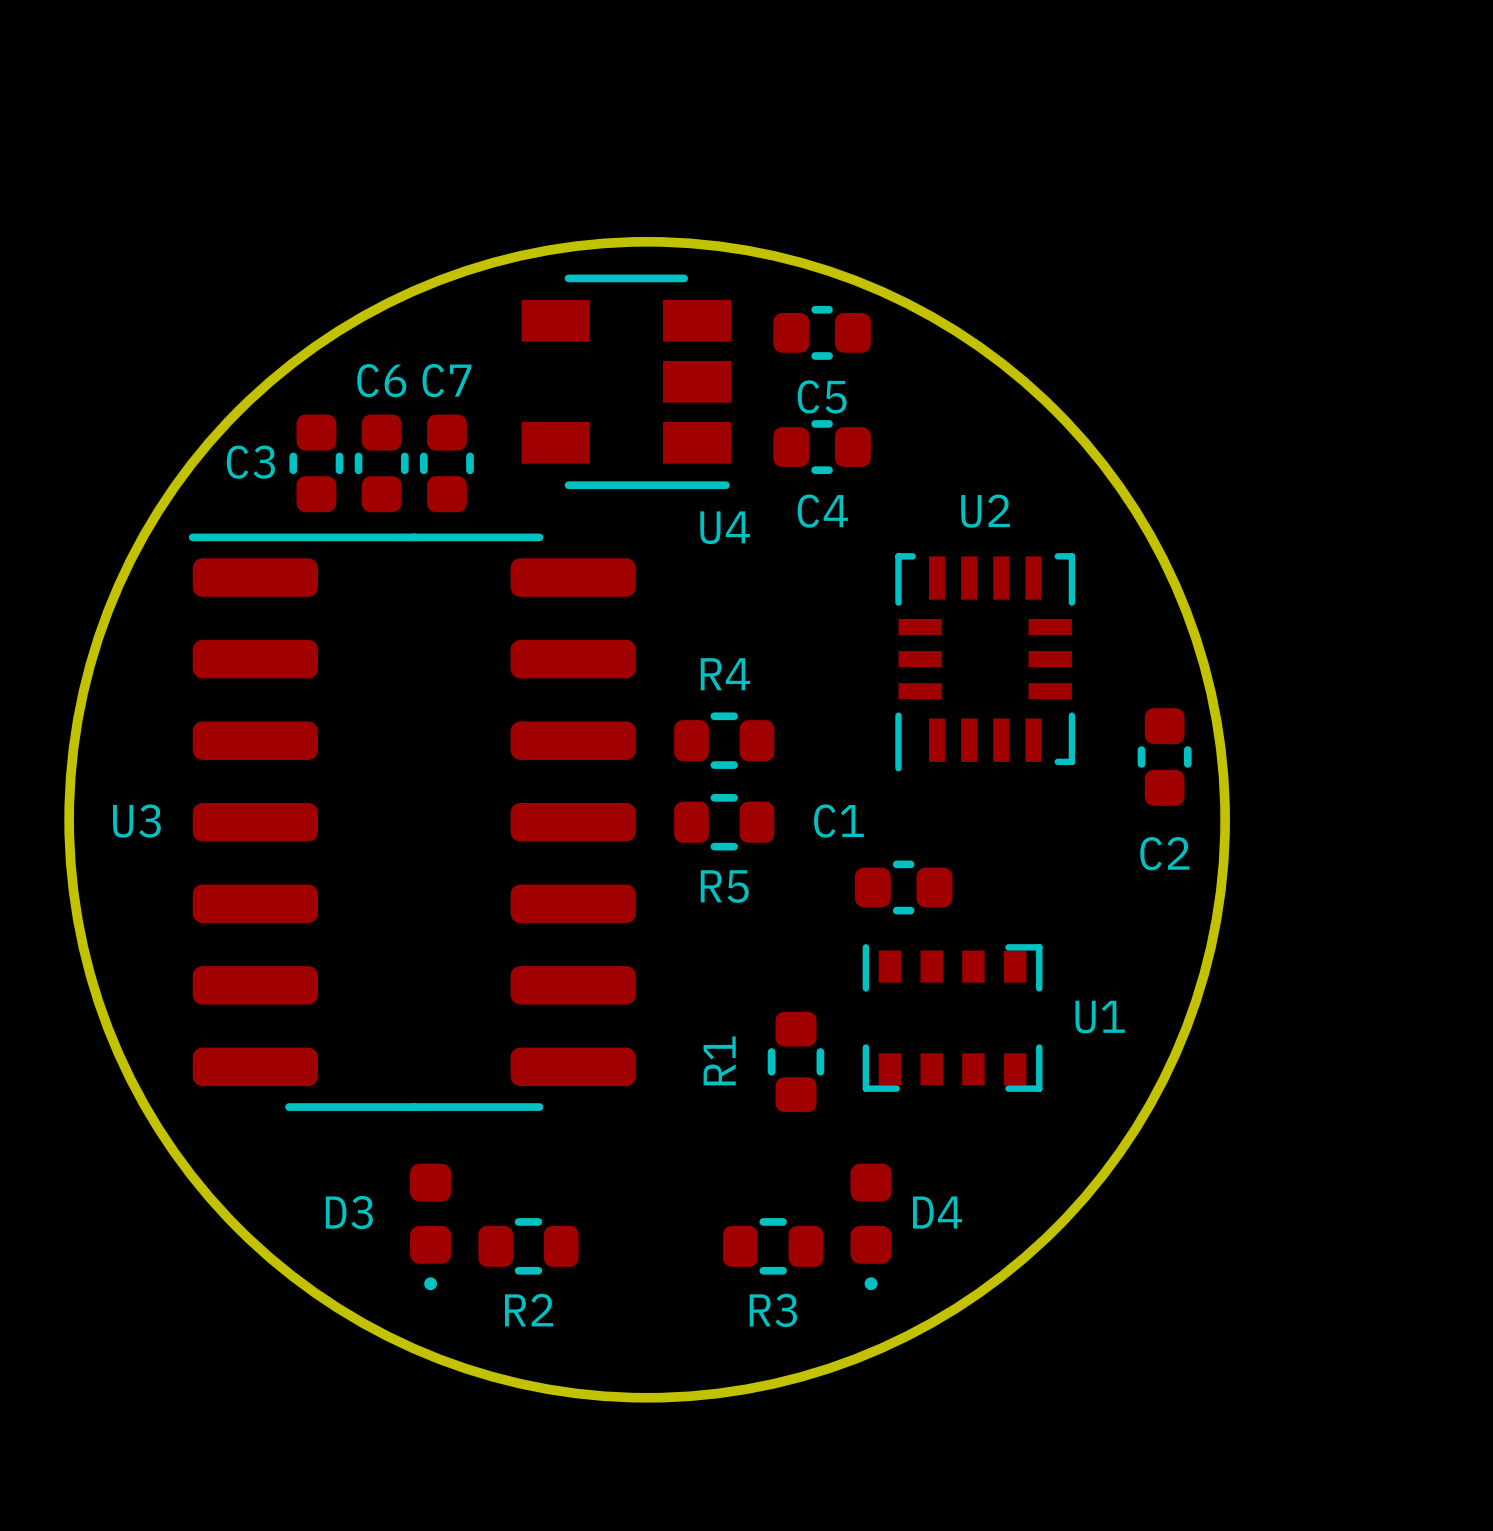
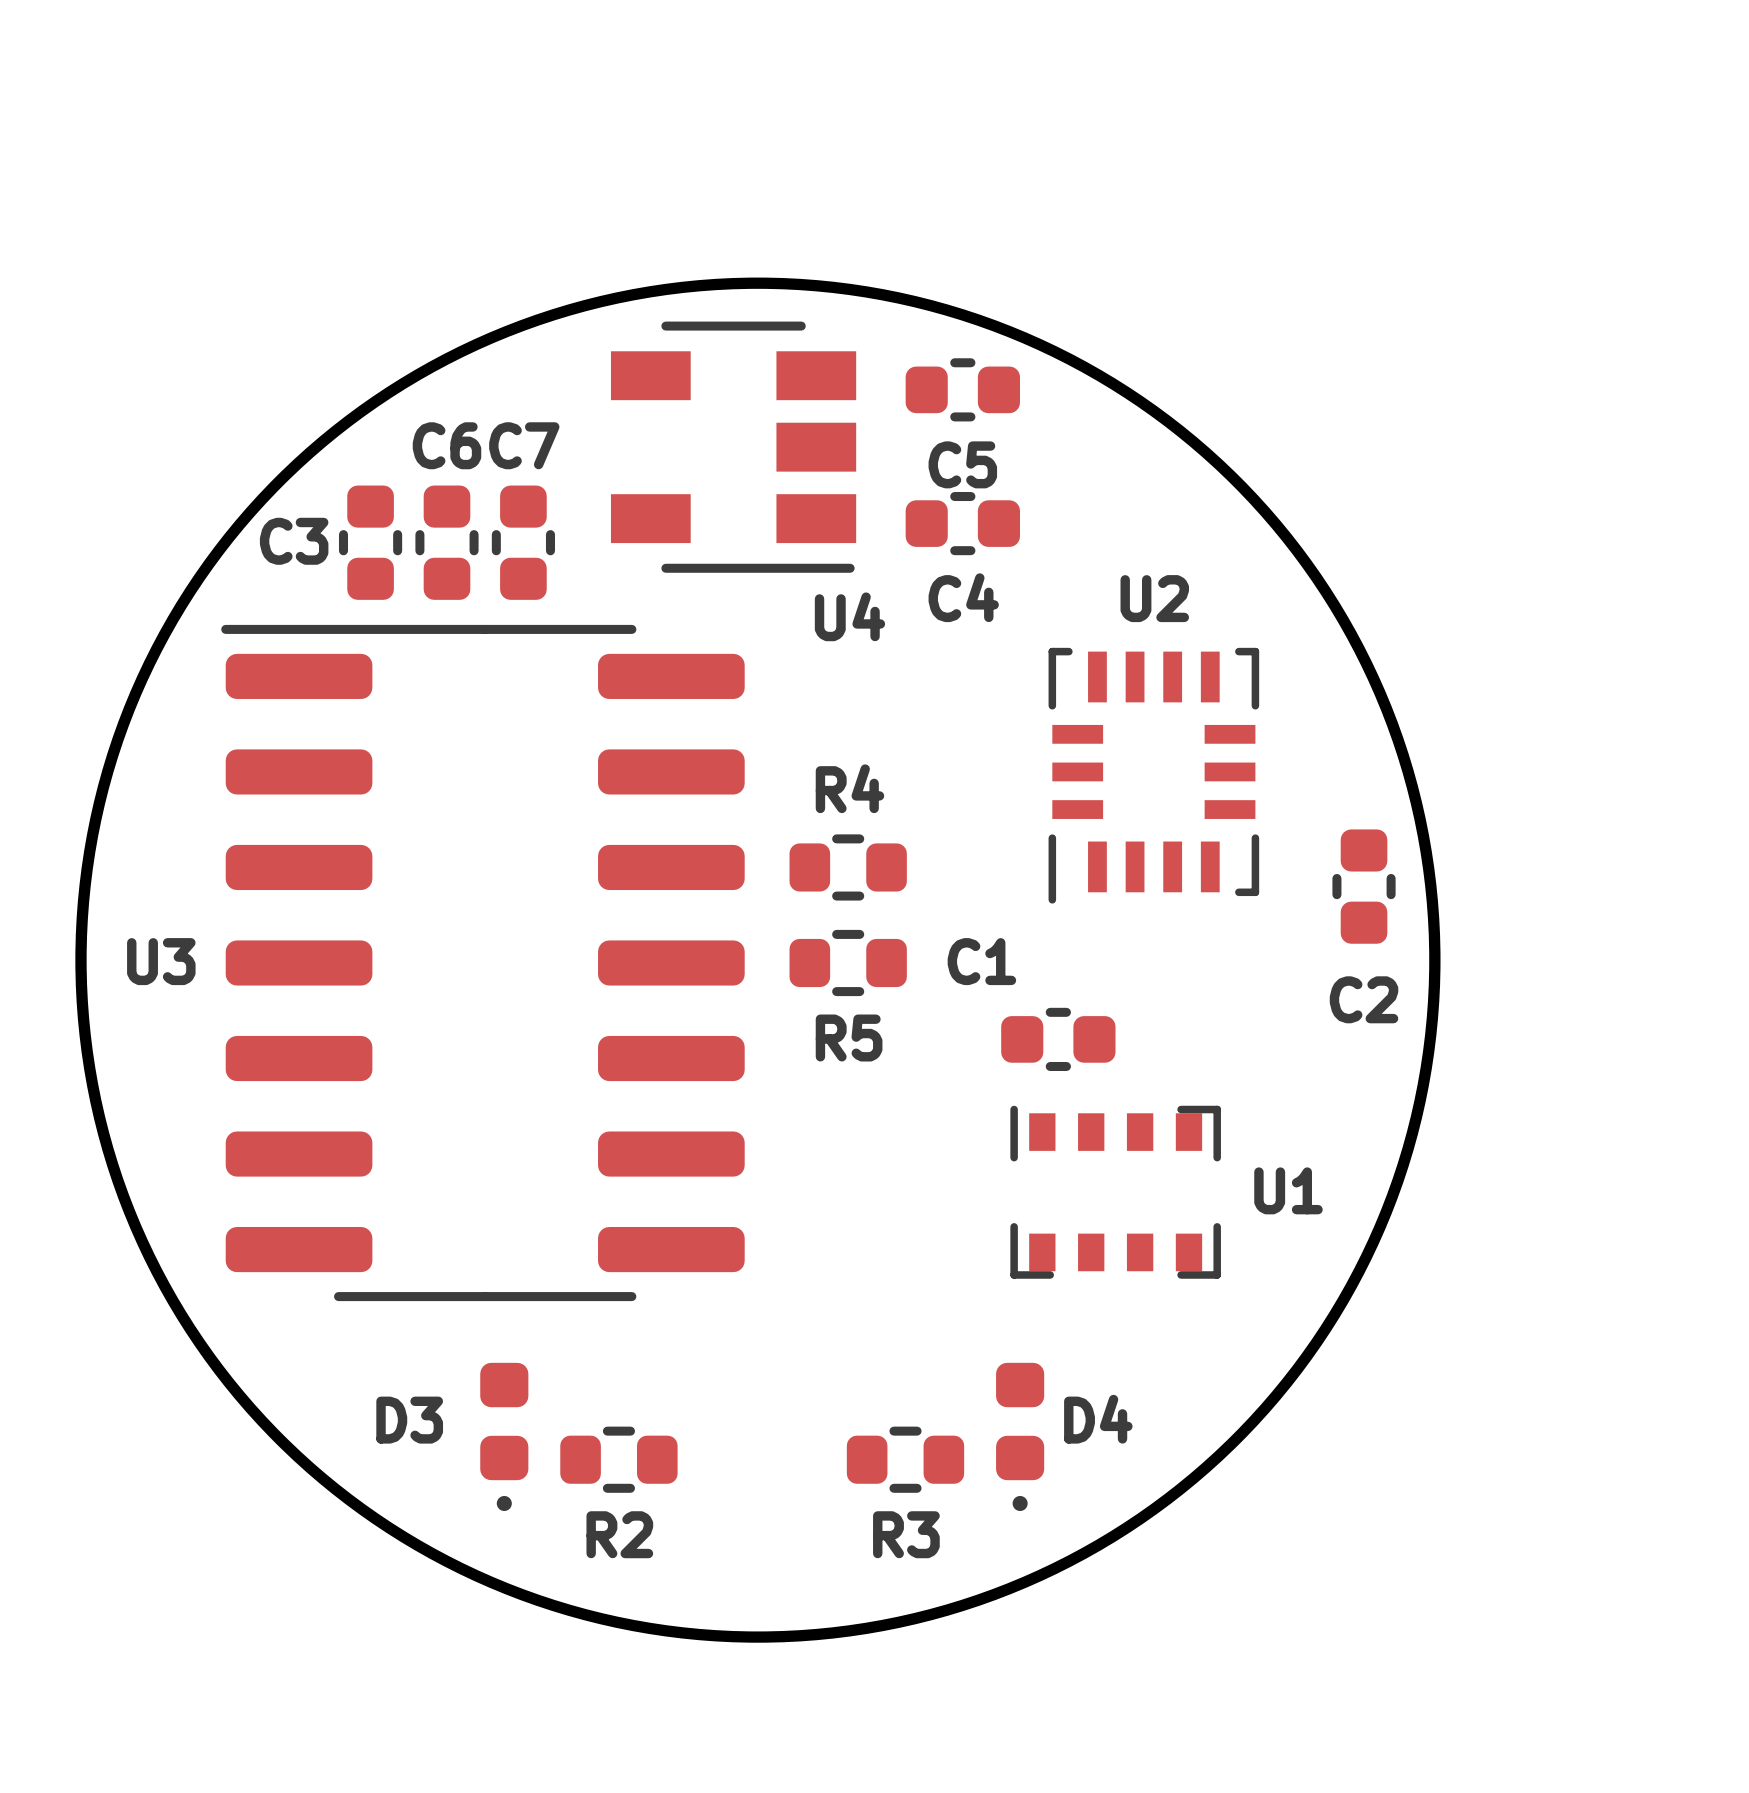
R1: (795, 1061) -> none

